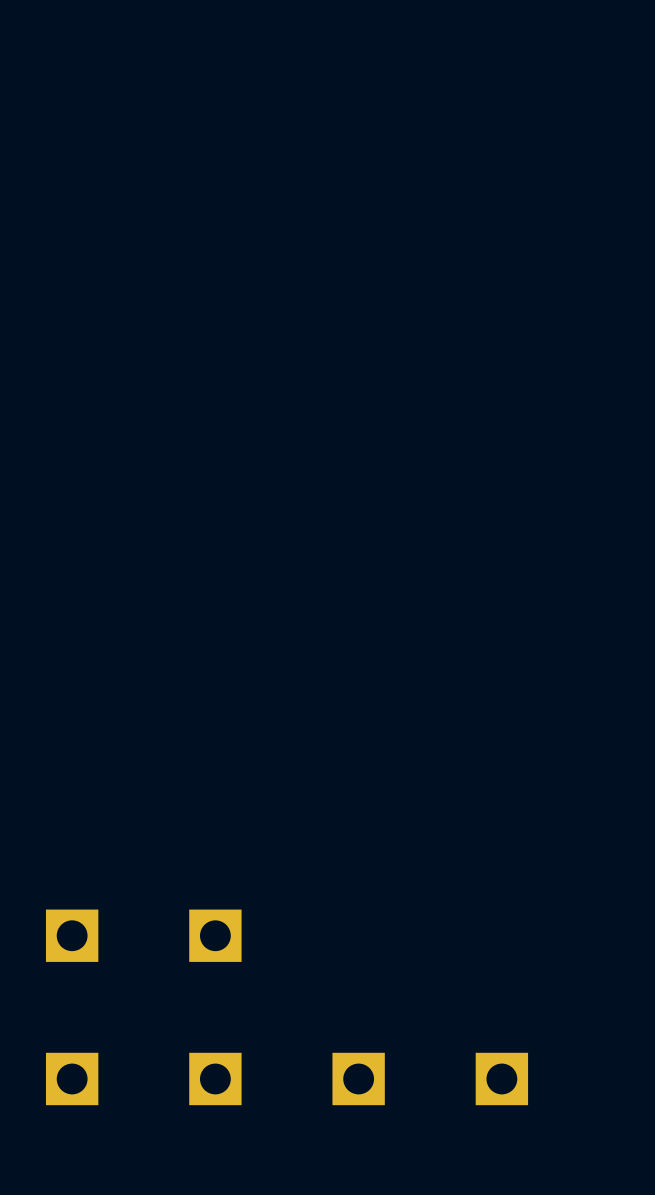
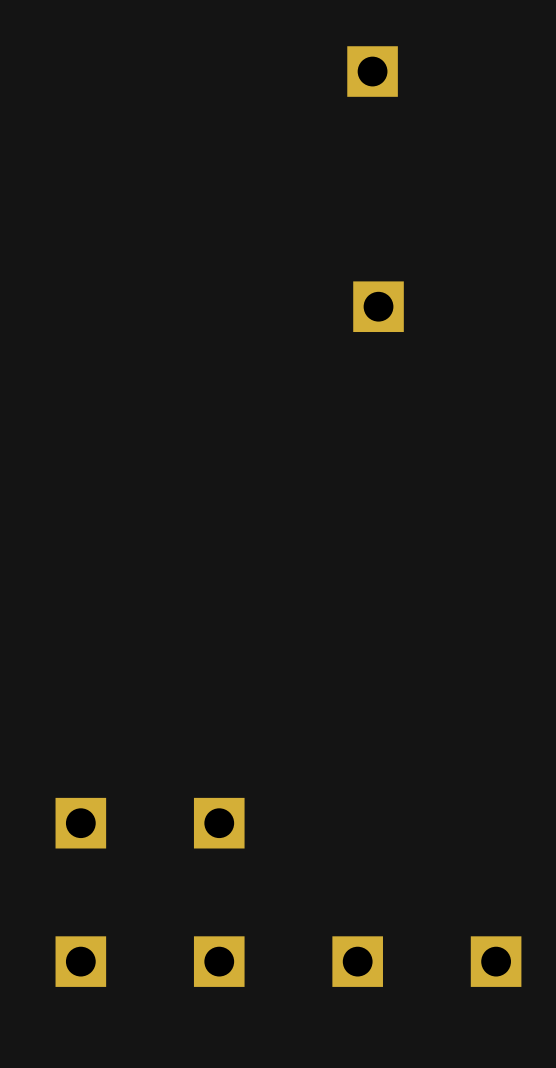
part: none -> (372, 71)
part: none -> (378, 306)

